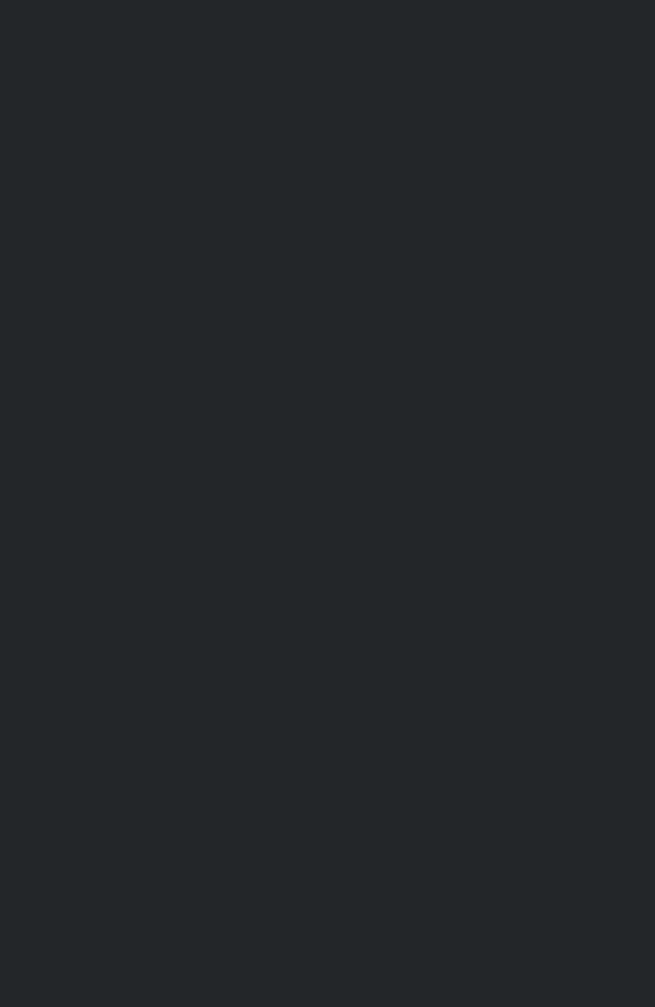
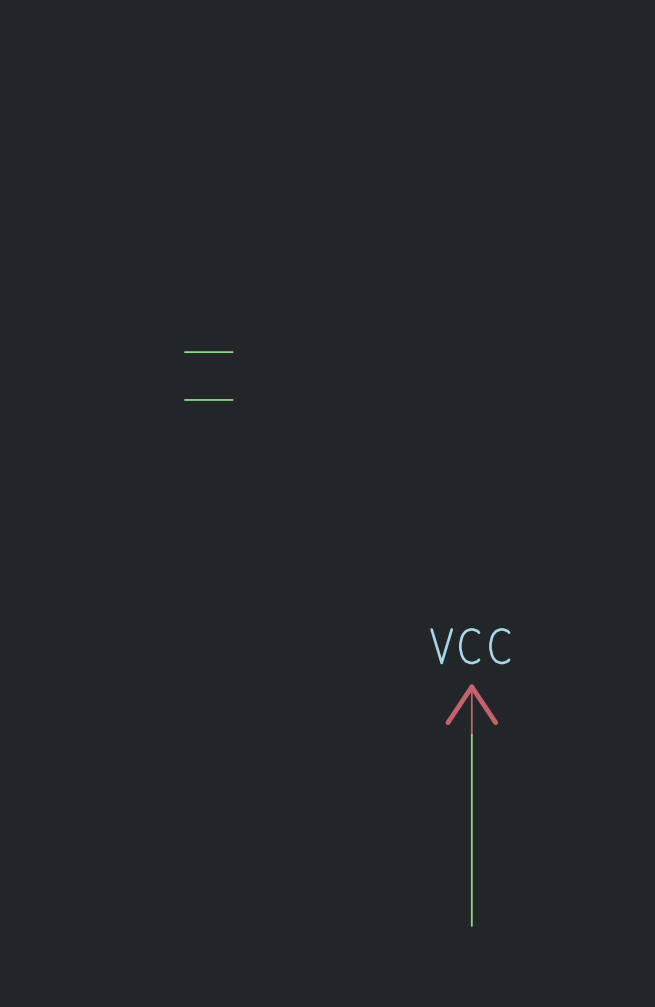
wire: none -> (184, 352) (232, 352)
wire: none -> (184, 399) (232, 399)
power symbol: none -> VCC (471, 709)
wire: none -> (471, 734) (471, 925)

